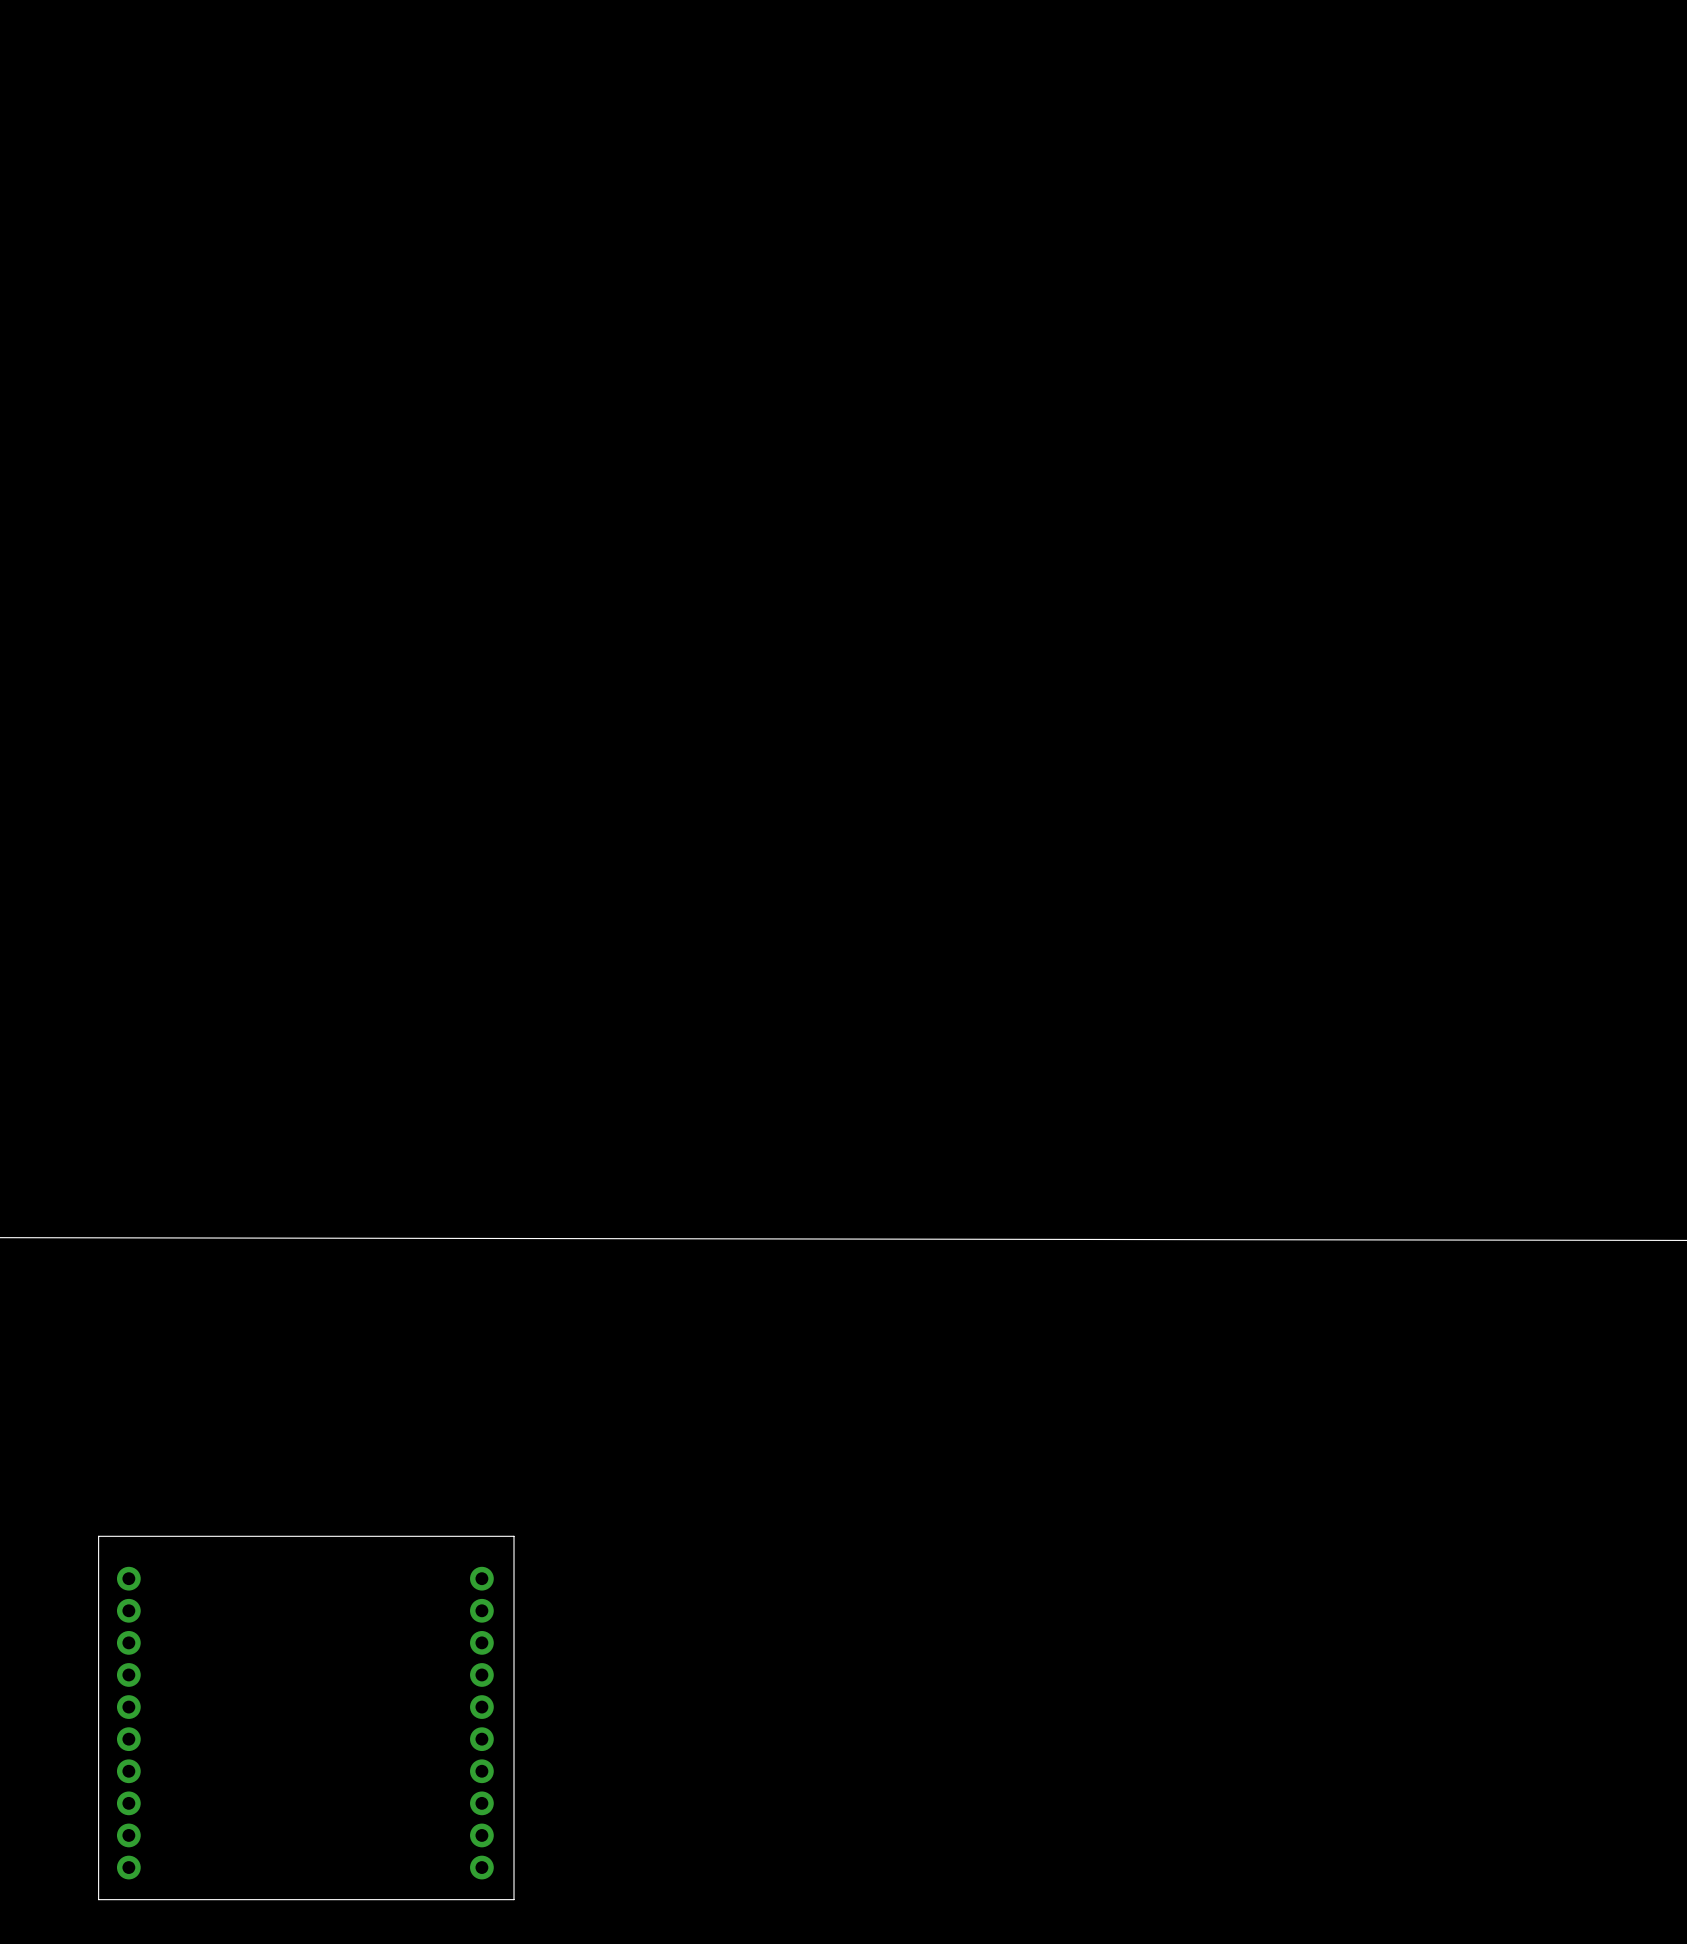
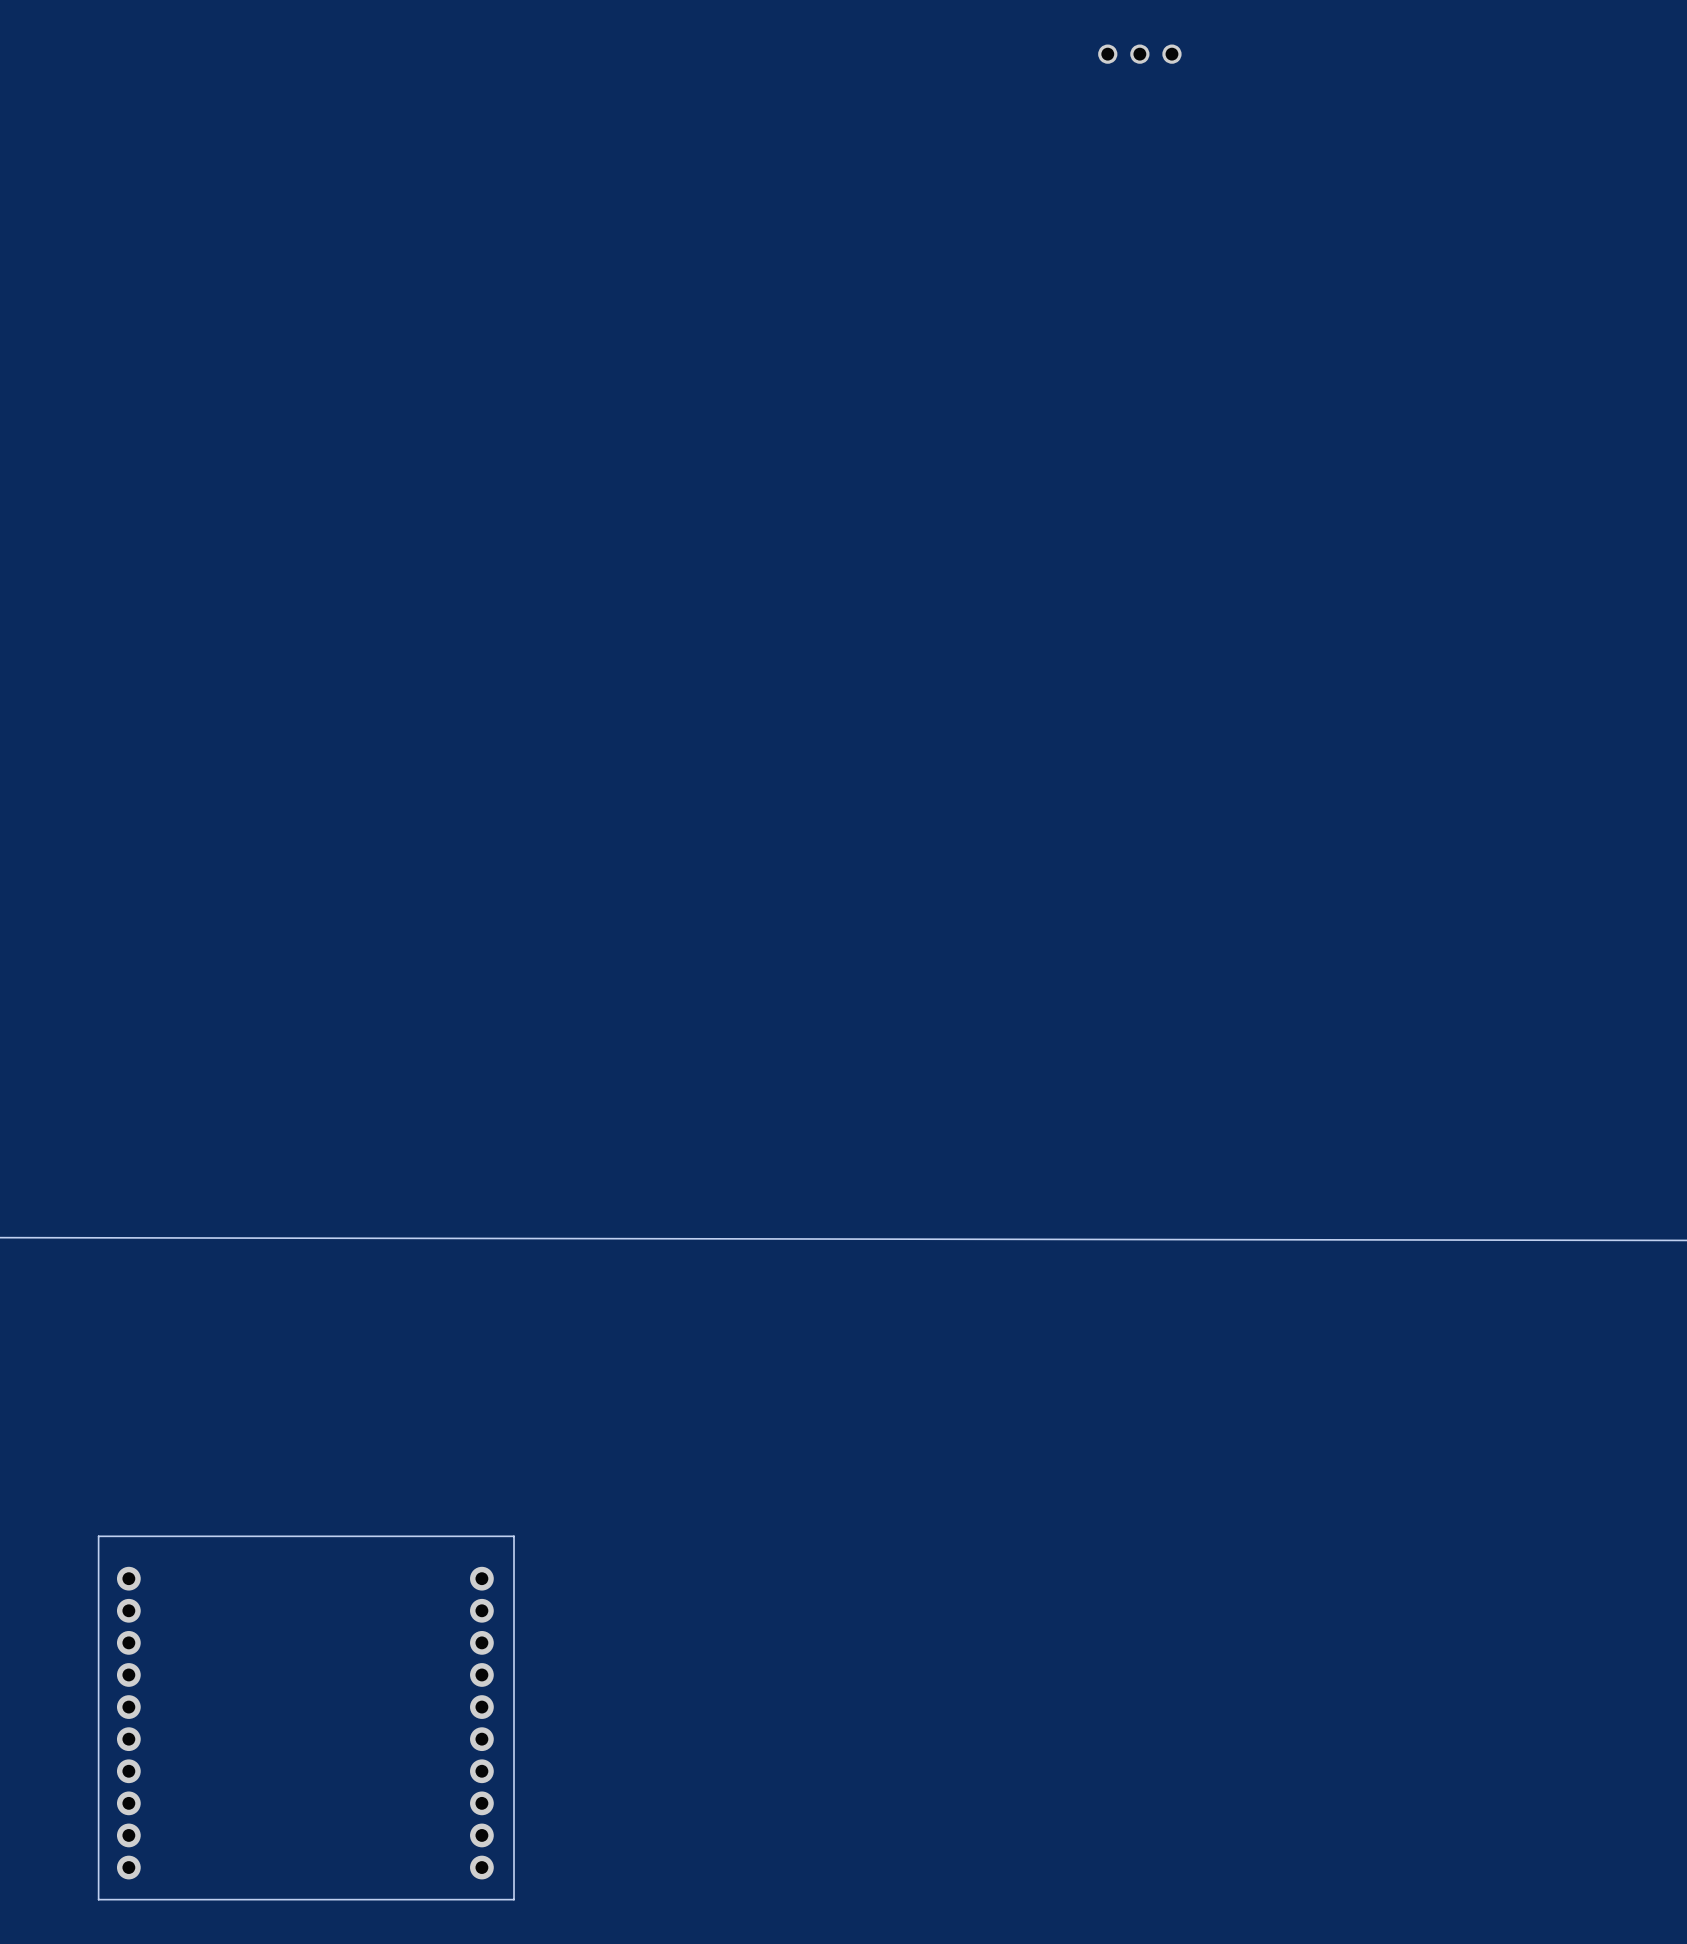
part: none -> (1139, 54)

